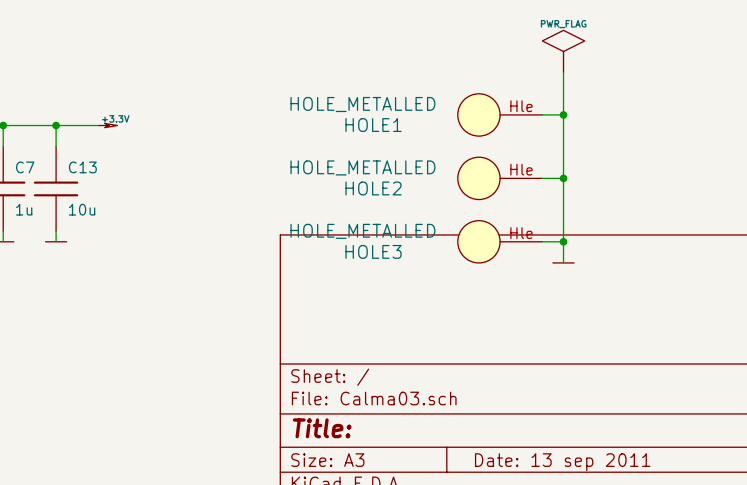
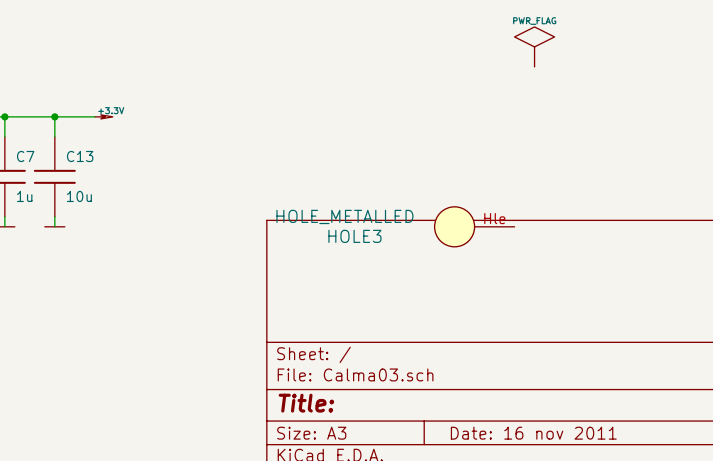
wire: (563, 72) (563, 262) -> none
HOLE1: HOLE_METALLED (500, 114) -> none
wire: (542, 114) (563, 114) -> none
junction: (563, 114) -> none
HOLE2: HOLE_METALLED (500, 178) -> none
wire: (542, 178) (563, 178) -> none
junction: (563, 178) -> none
wire: (542, 241) (563, 241) -> none
junction: (563, 241) -> none
power symbol: (563, 262) -> none
title block: Date: 13 sep 2011 (562, 462) -> Date: 16 nov 2011 (533, 433)

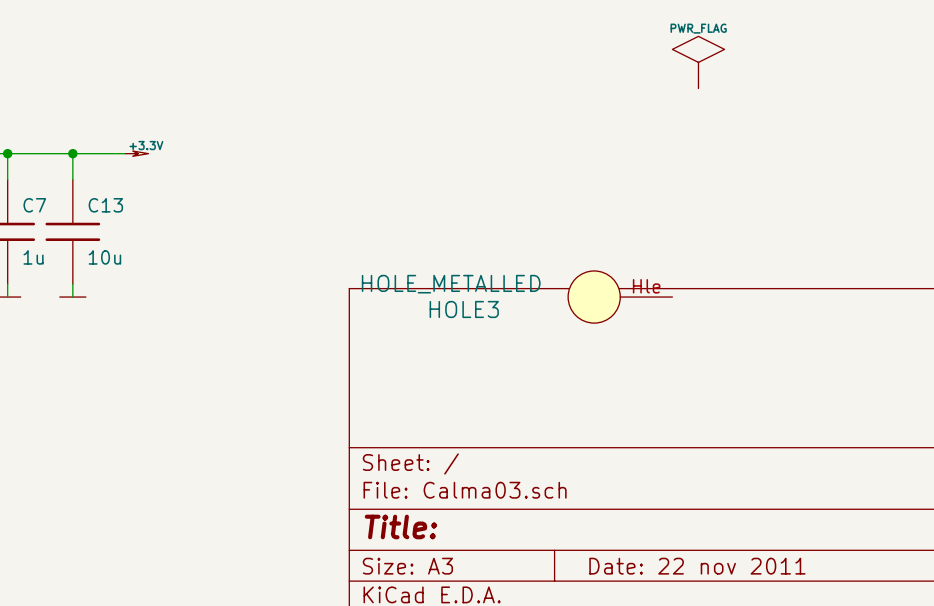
title block: Date: 16 nov 2011 (533, 433) -> Date: 22 nov 2011 (697, 566)

